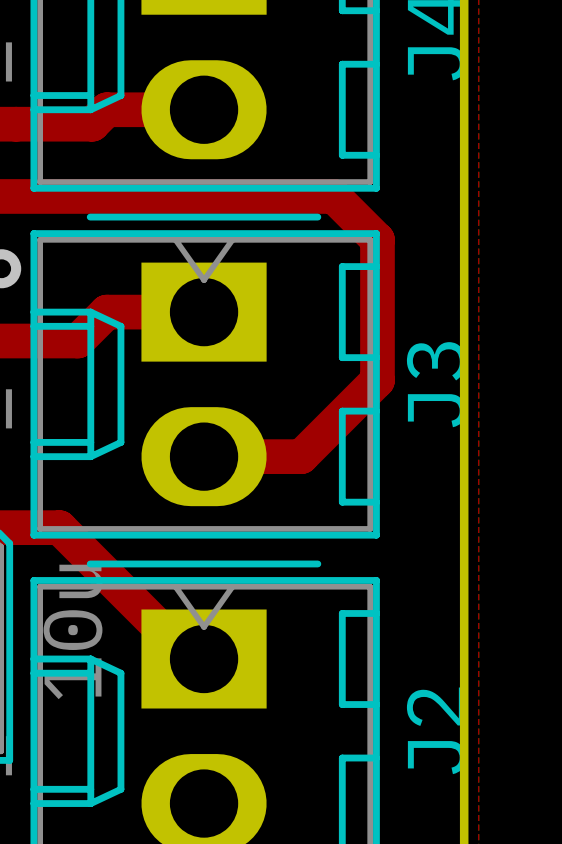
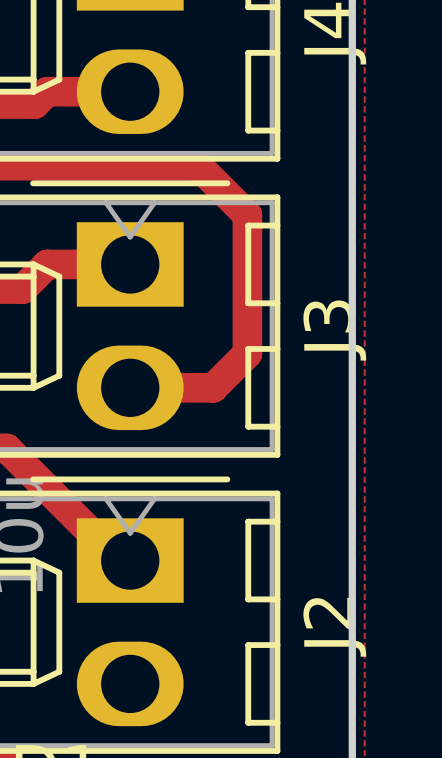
top track: (283, 196) (334, 196) (377, 239) (377, 380) (341, 416) -> (198, 165) (247, 215) (247, 353)

